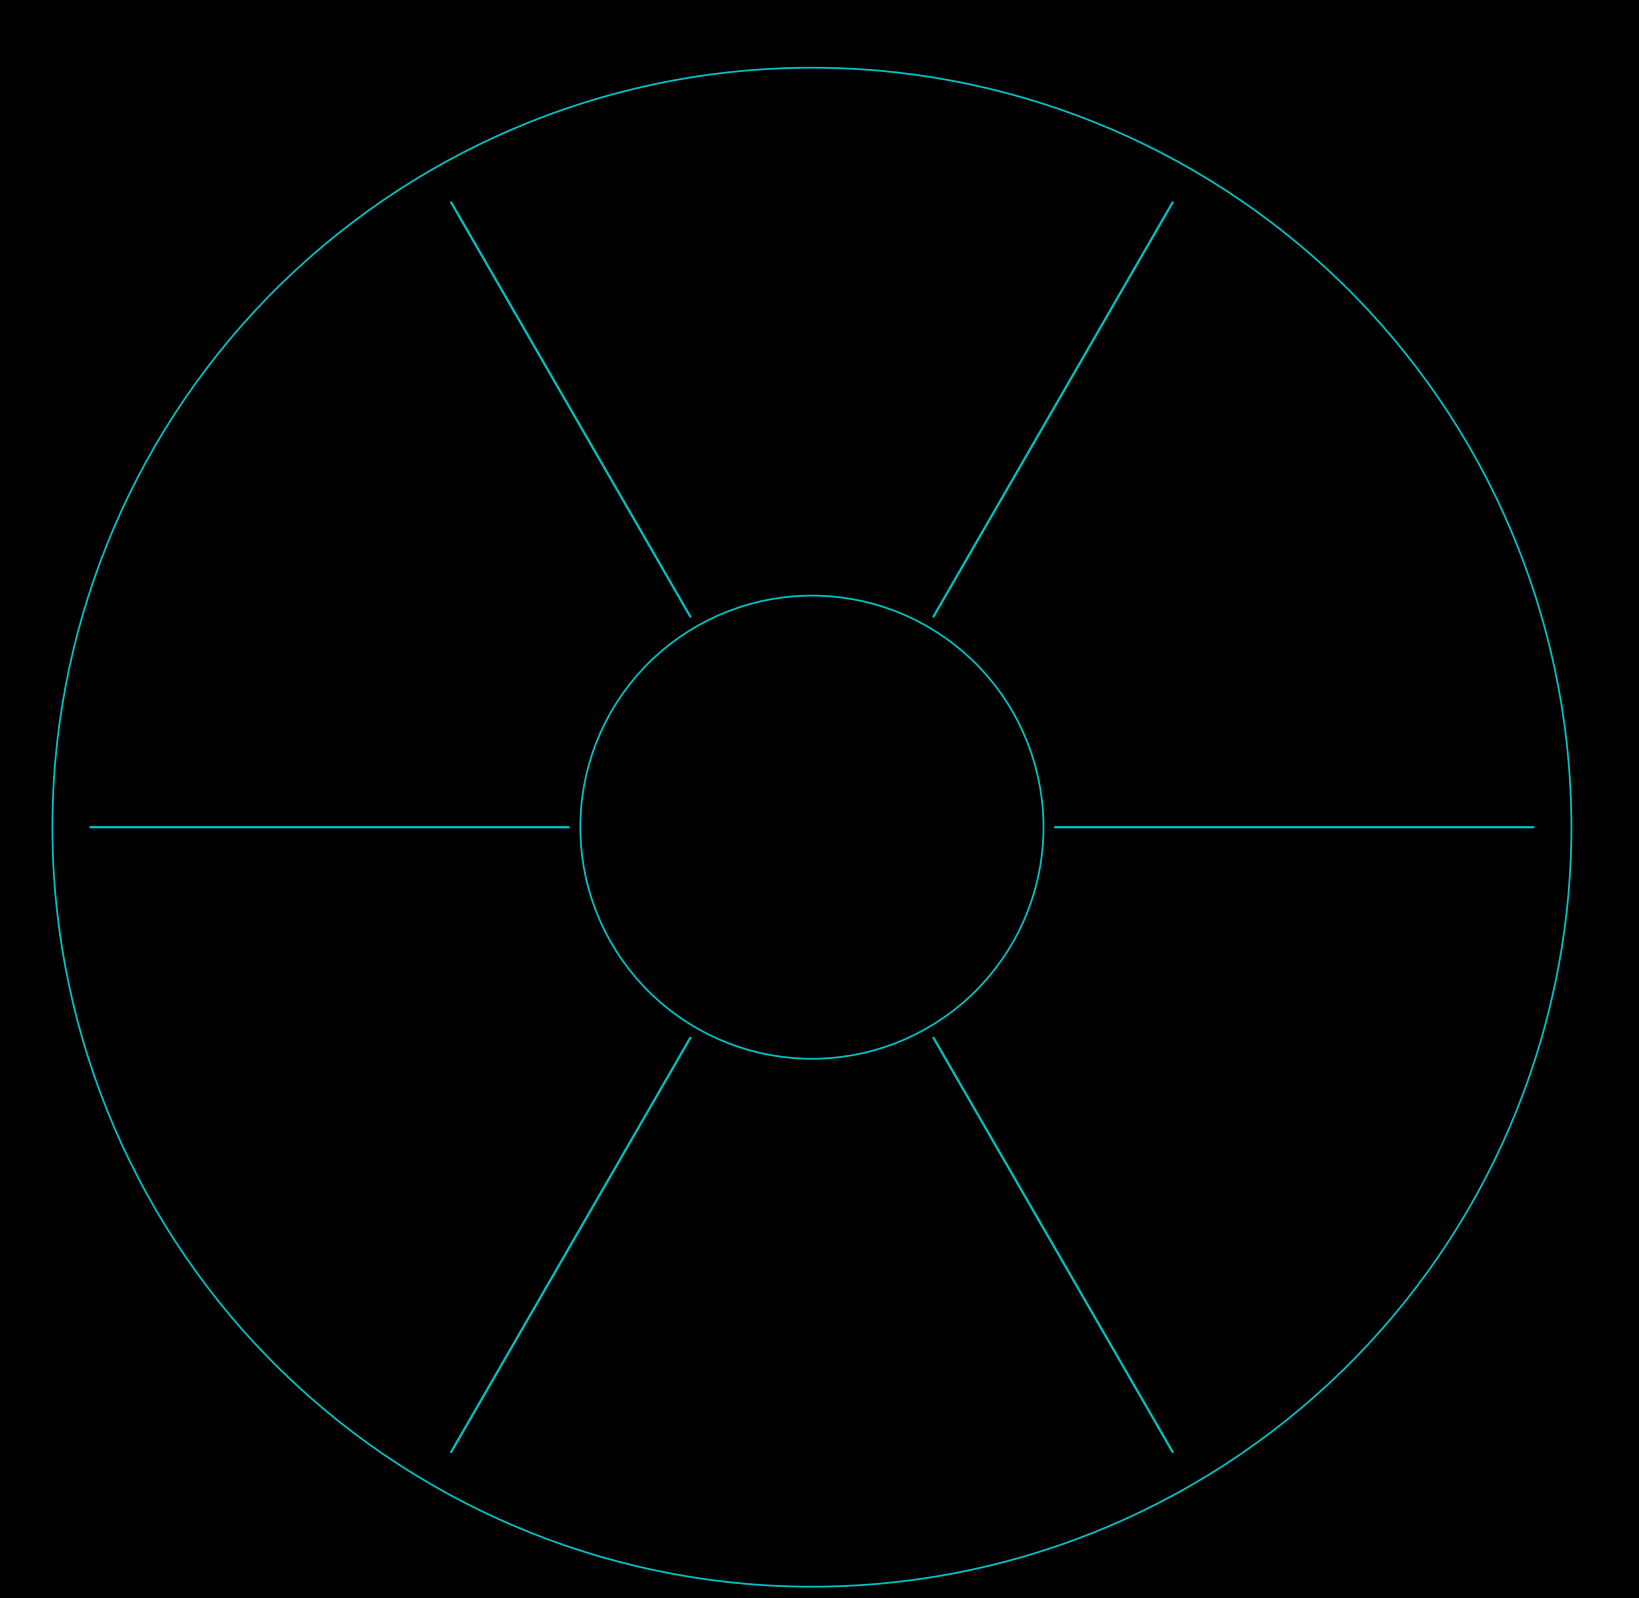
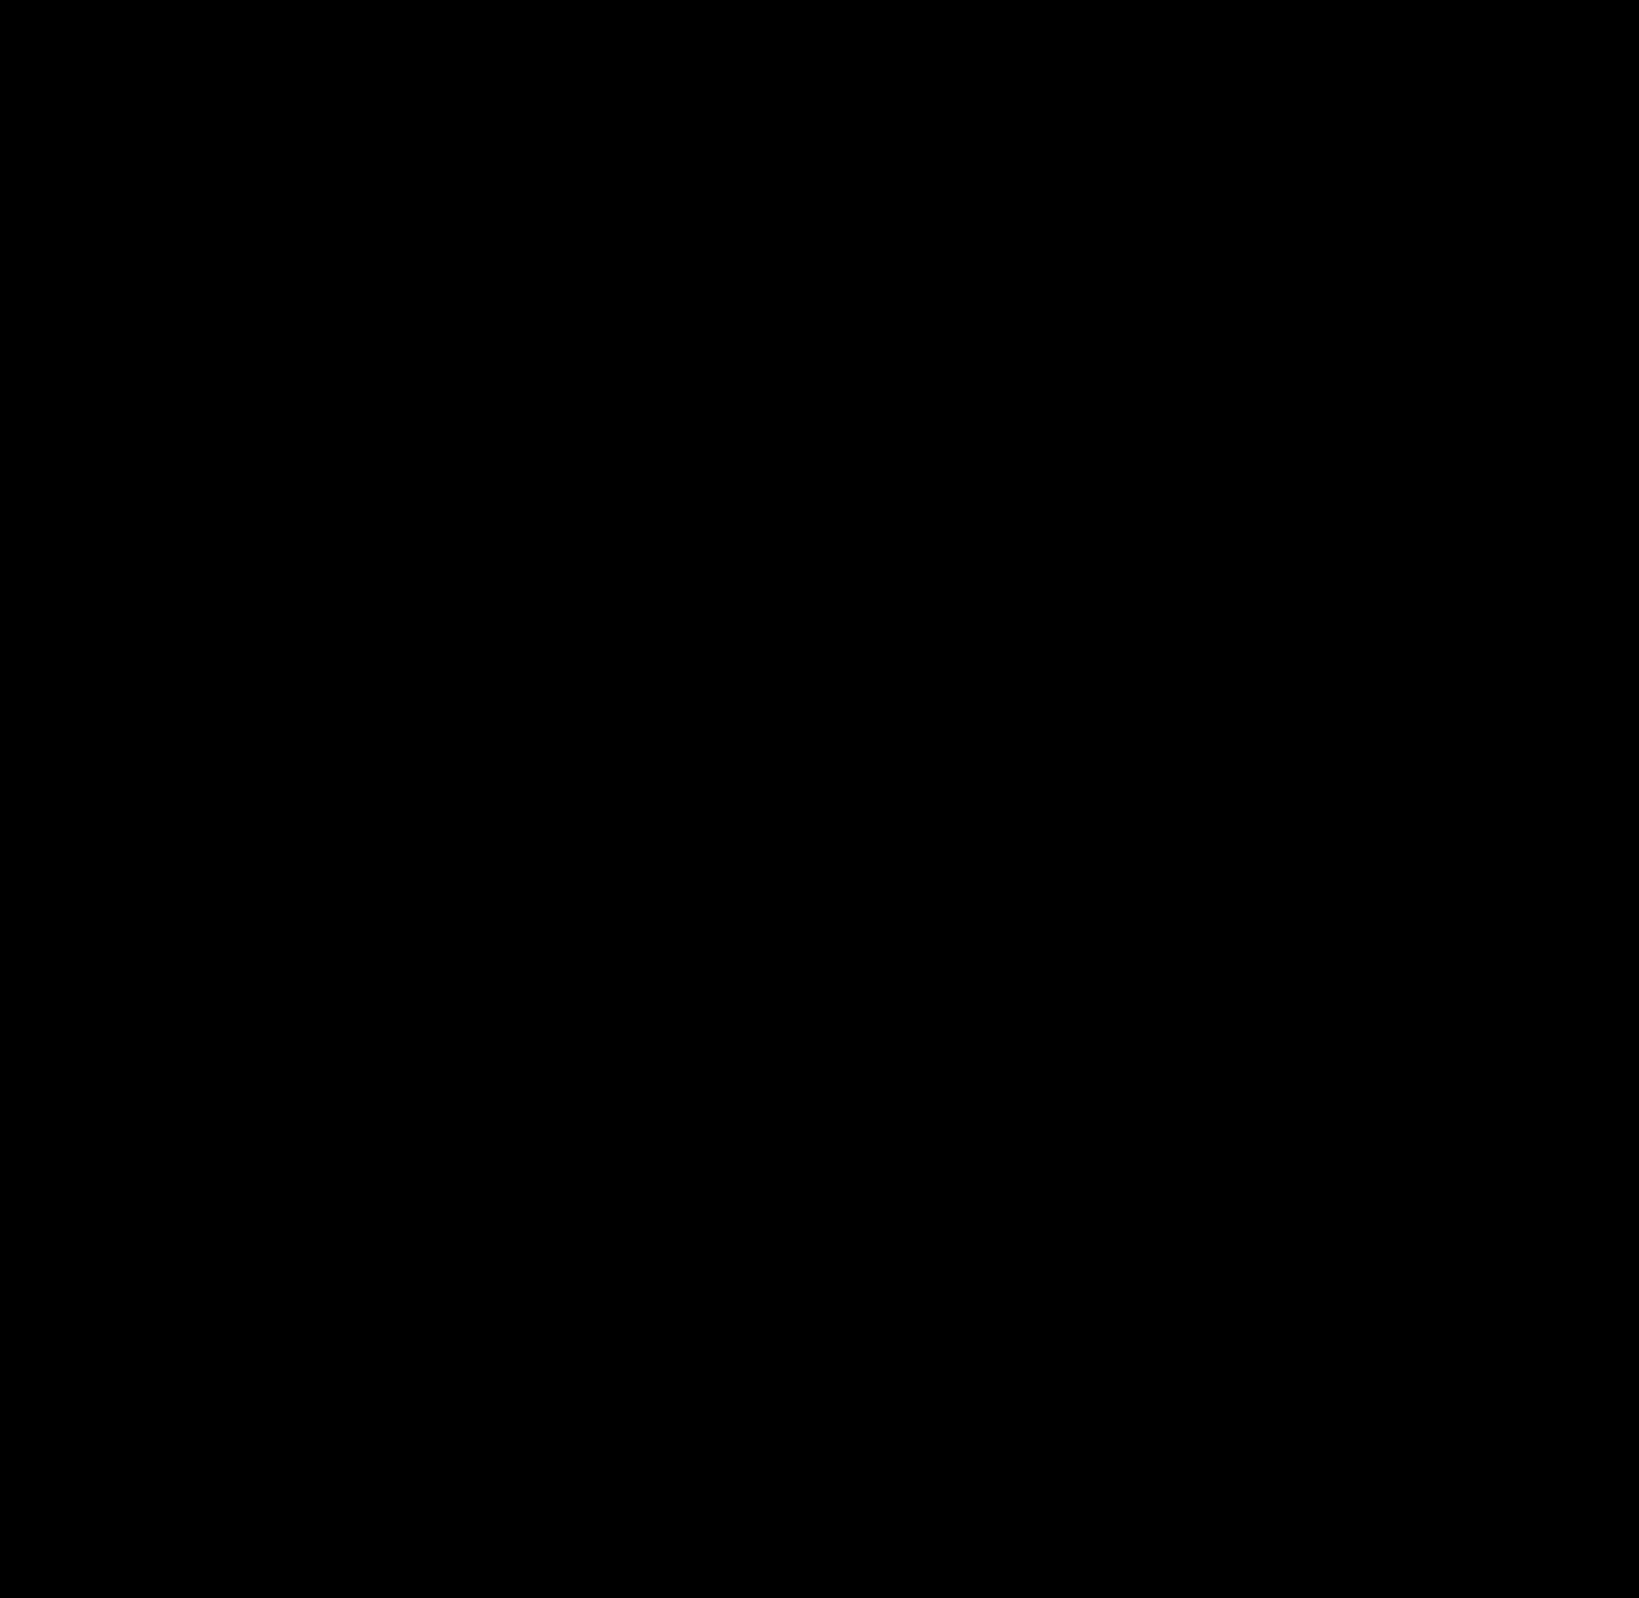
drawing: [51, 66, 1573, 1588] -> none
line: (451, 202) (690, 616) -> none
line: (1172, 202) (933, 616) -> none
line: (90, 827) (568, 827) -> none
line: (1055, 827) (1533, 827) -> none
line: (690, 1037) (451, 1452) -> none
line: (933, 1037) (1172, 1452) -> none

